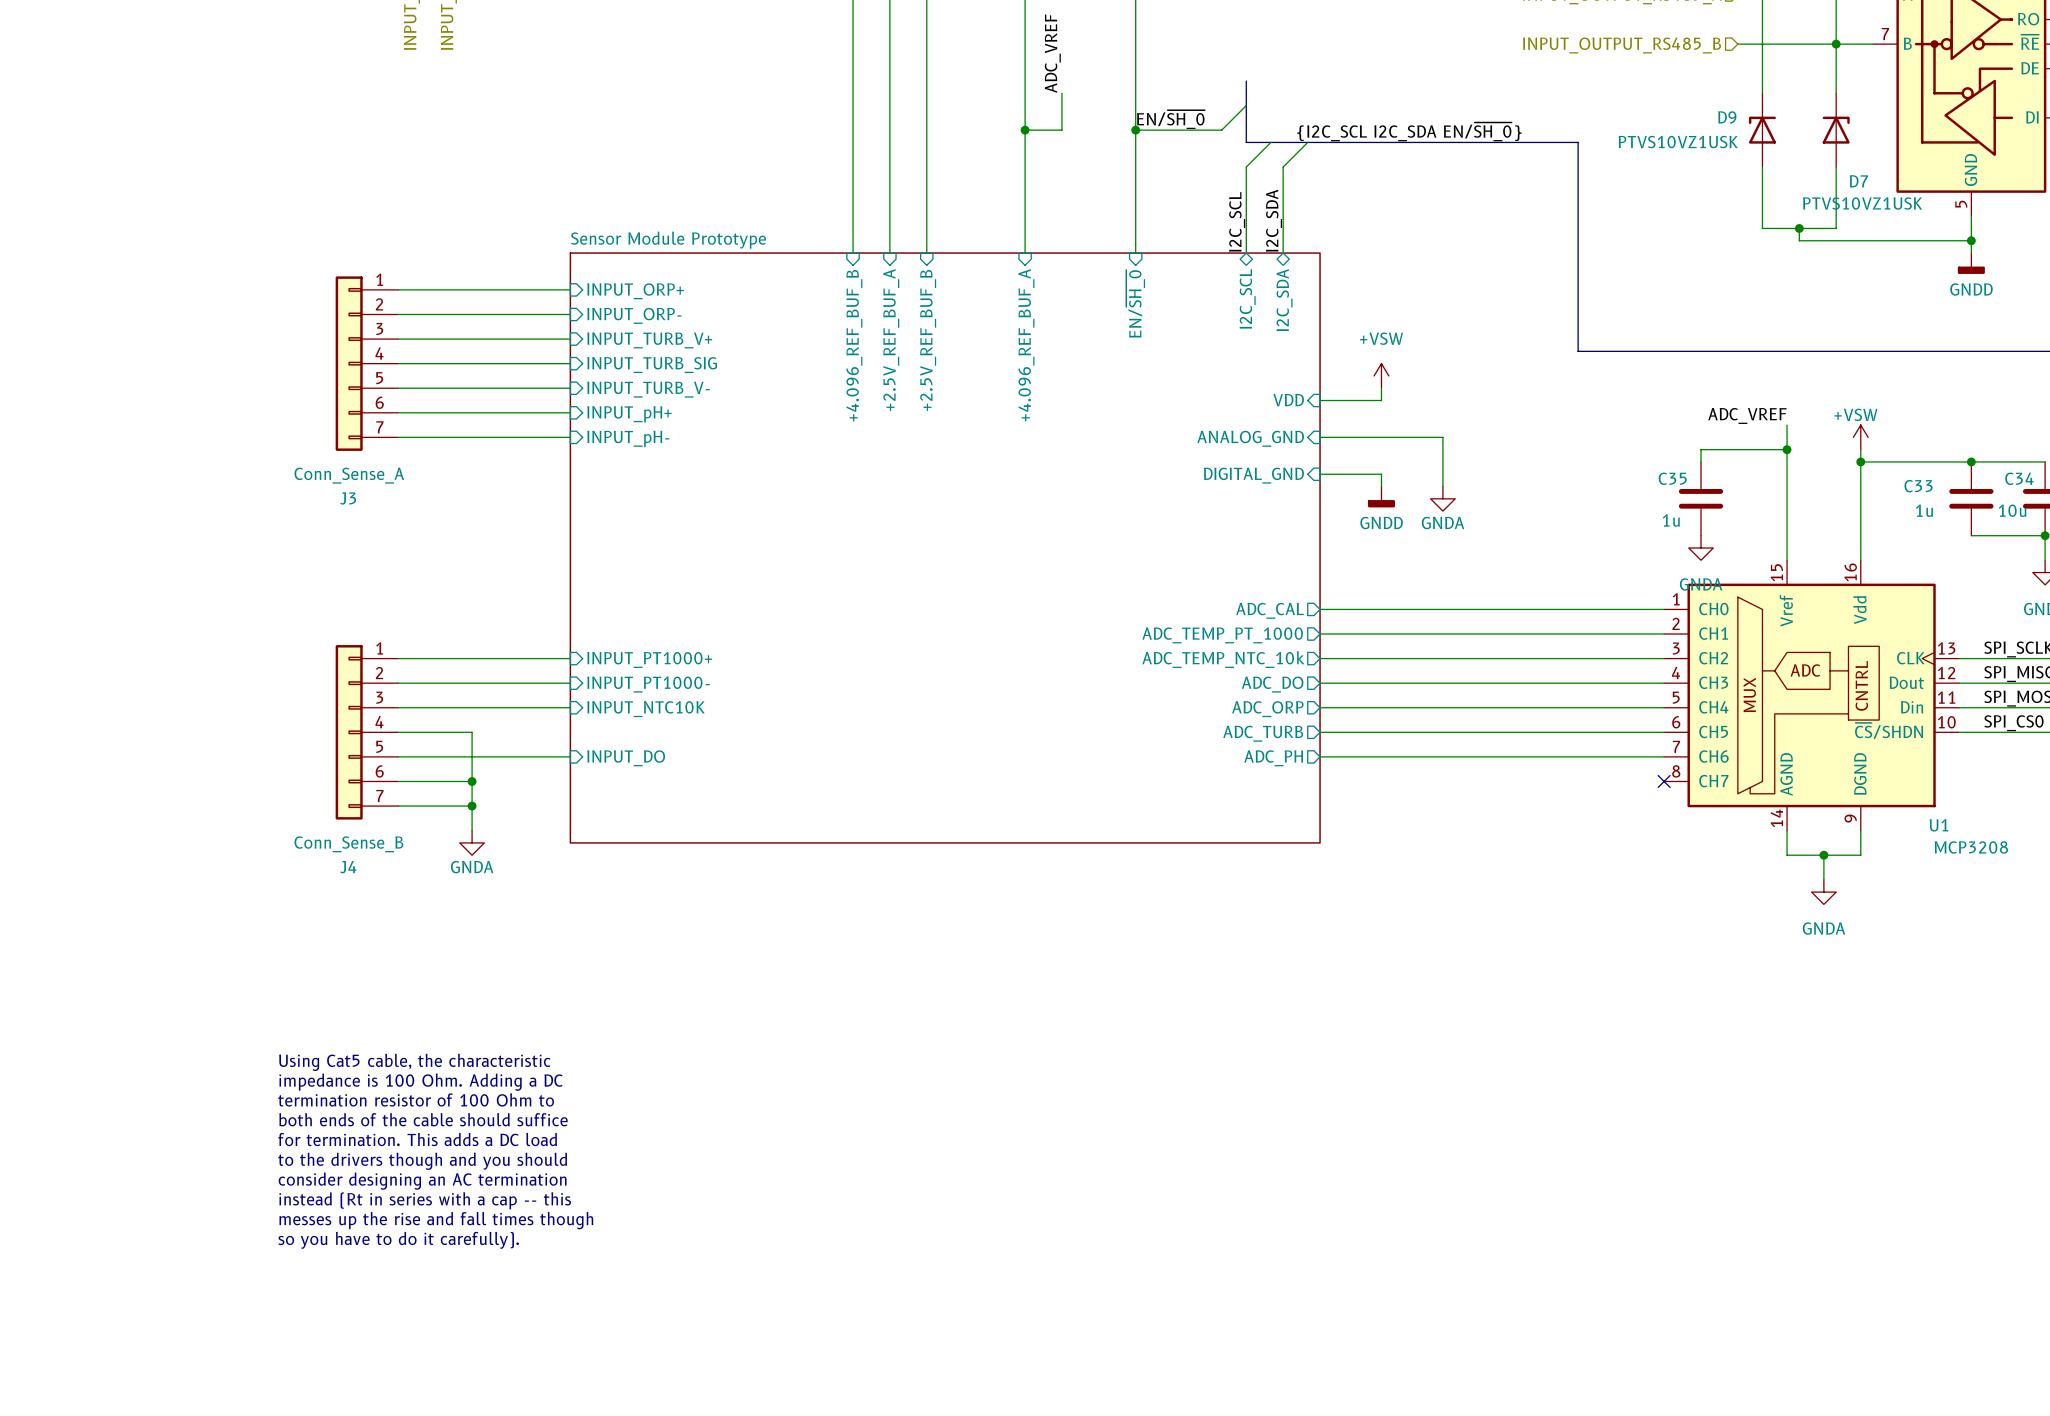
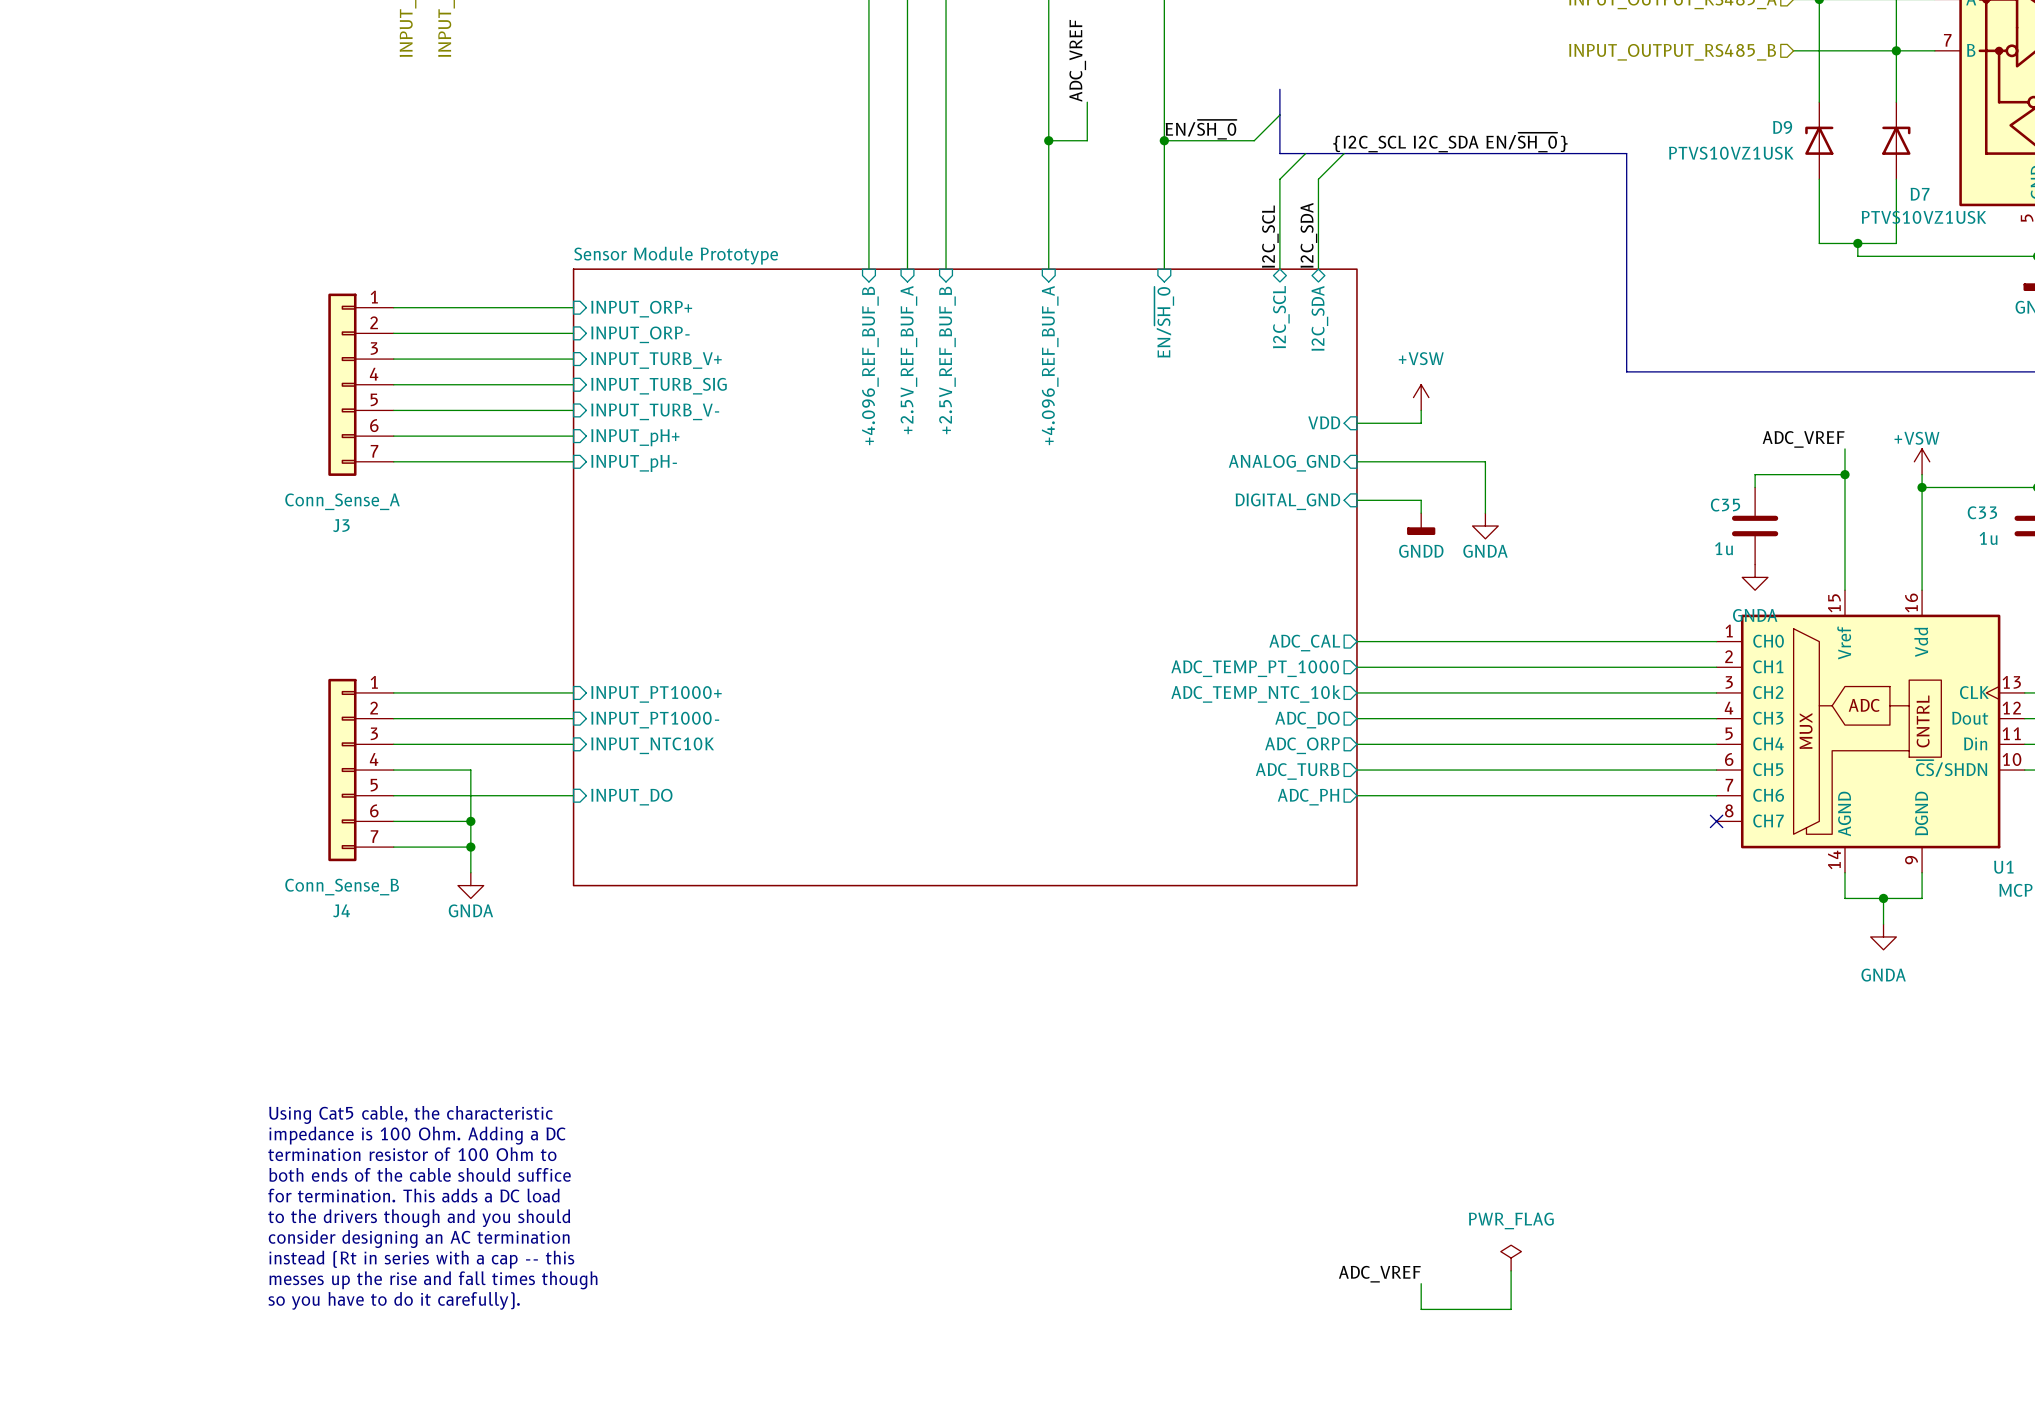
power symbol: none -> PWR_FLAG (1511, 1258)
wire: none -> (1511, 1270) (1511, 1309) (1421, 1309) (1421, 1283)
label: none -> ADC_VREF (1379, 1274)

